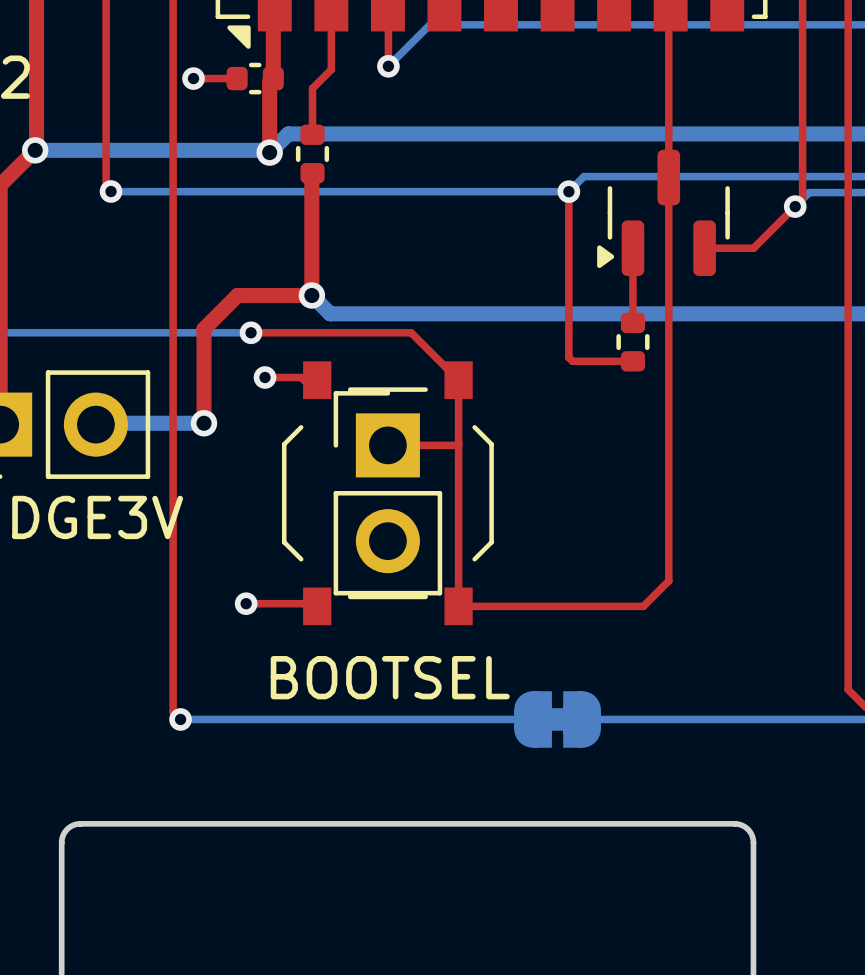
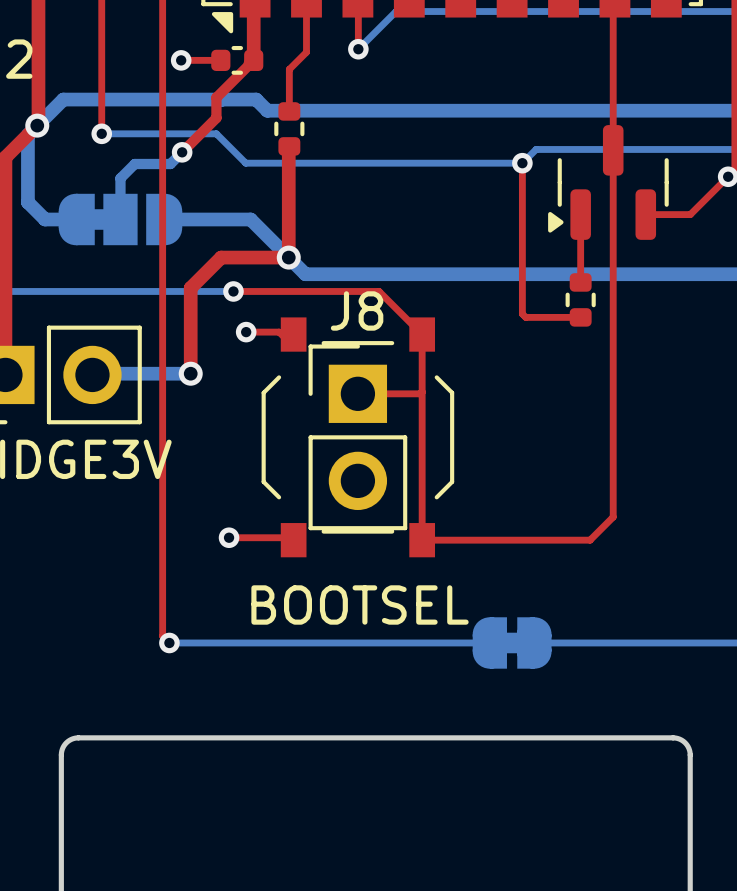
top track: none -> (253, 60) (216, 97) (216, 118) (182, 152)
top track: (269, 82) (269, 152) -> none
bottom track: (288, 133) (269, 152) (267, 150) (35, 150) -> (267, 110) (256, 99) (63, 99) (27, 134) (27, 202) (45, 219) (75, 219)
via: (269, 152) -> none
top track: (106, 159) (106, 186) (111, 191) -> none
bottom track: none -> (182, 152) (170, 164) (134, 164) (120, 178) (120, 219)
via: none -> (182, 152)
bottom track: (111, 191) (264, 191) -> (101, 133) (216, 133) (245, 163)
via position: (111, 191) -> (101, 133)
part: none -> (120, 219)
bottom track: none -> (165, 219) (250, 219) (288, 257)
J8 name: none -> J8 (357, 310)

